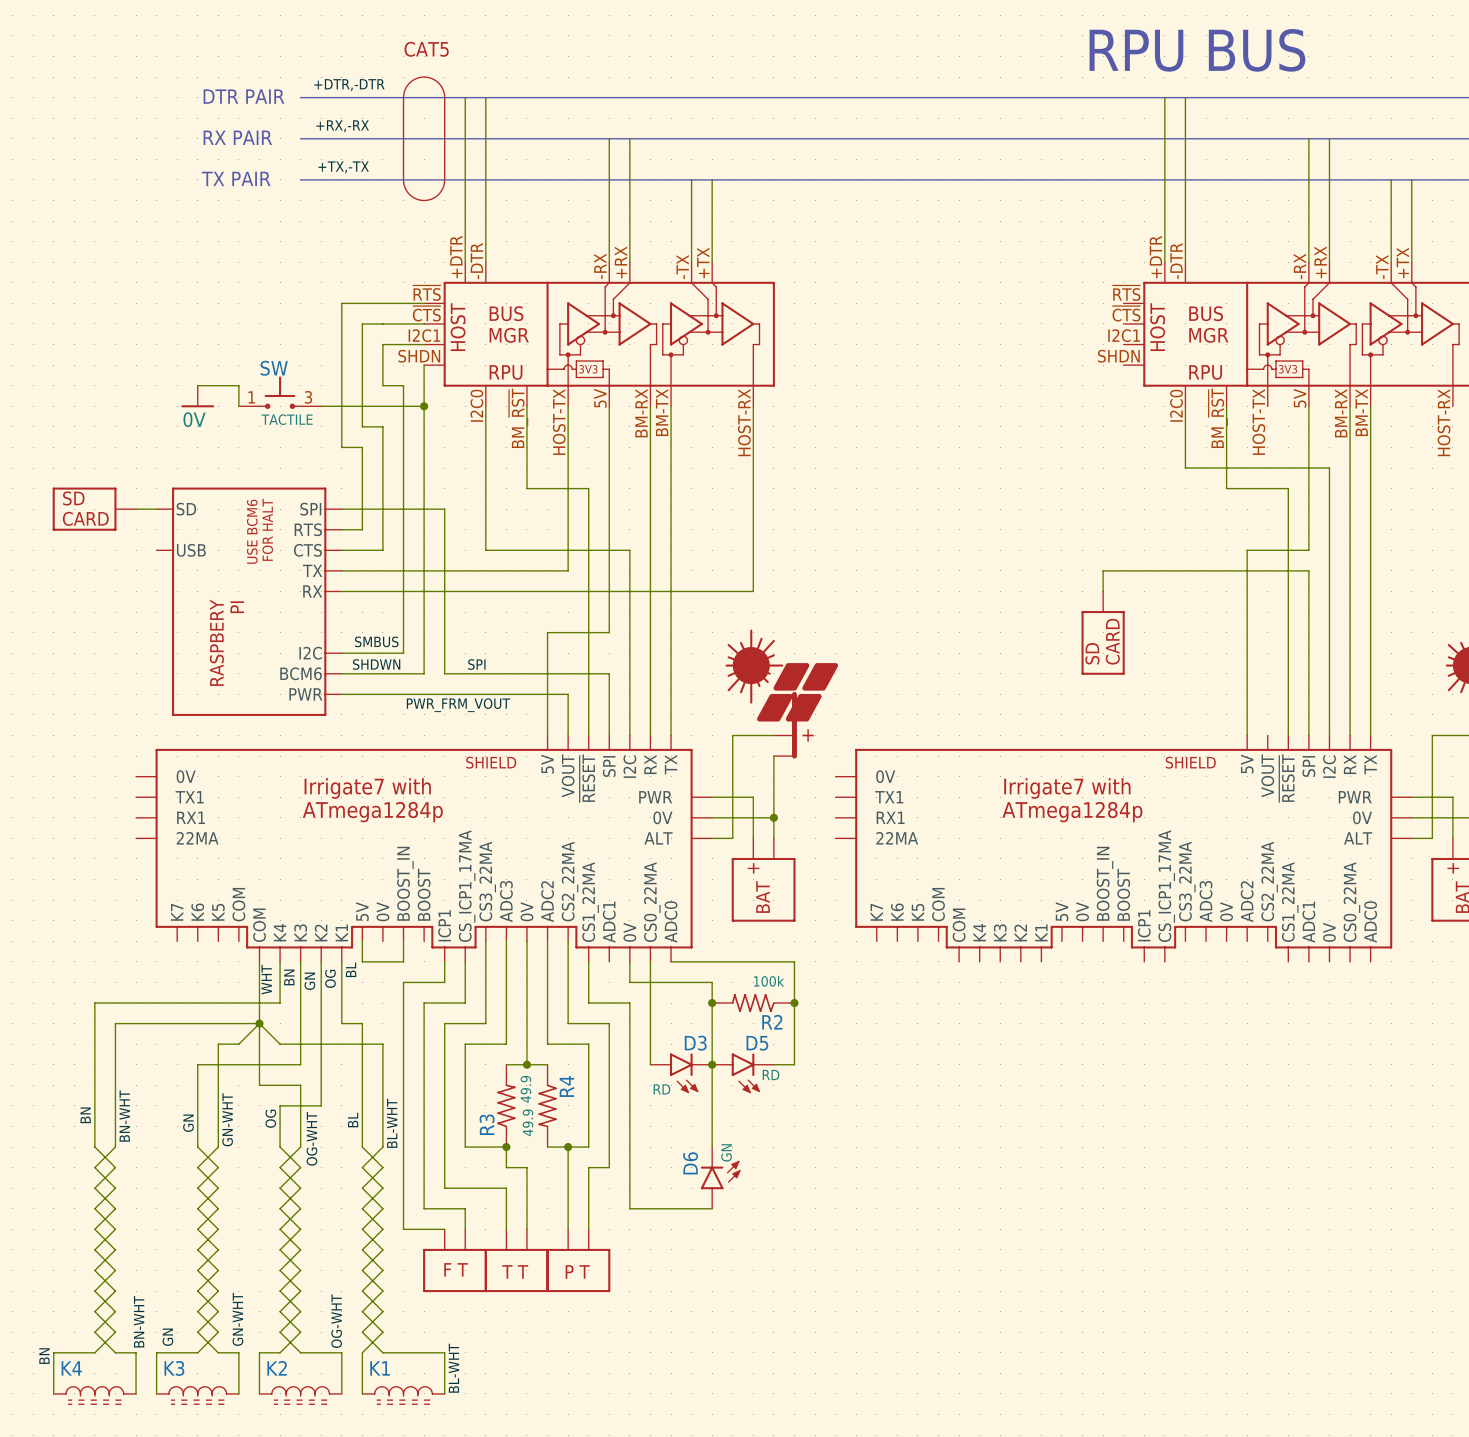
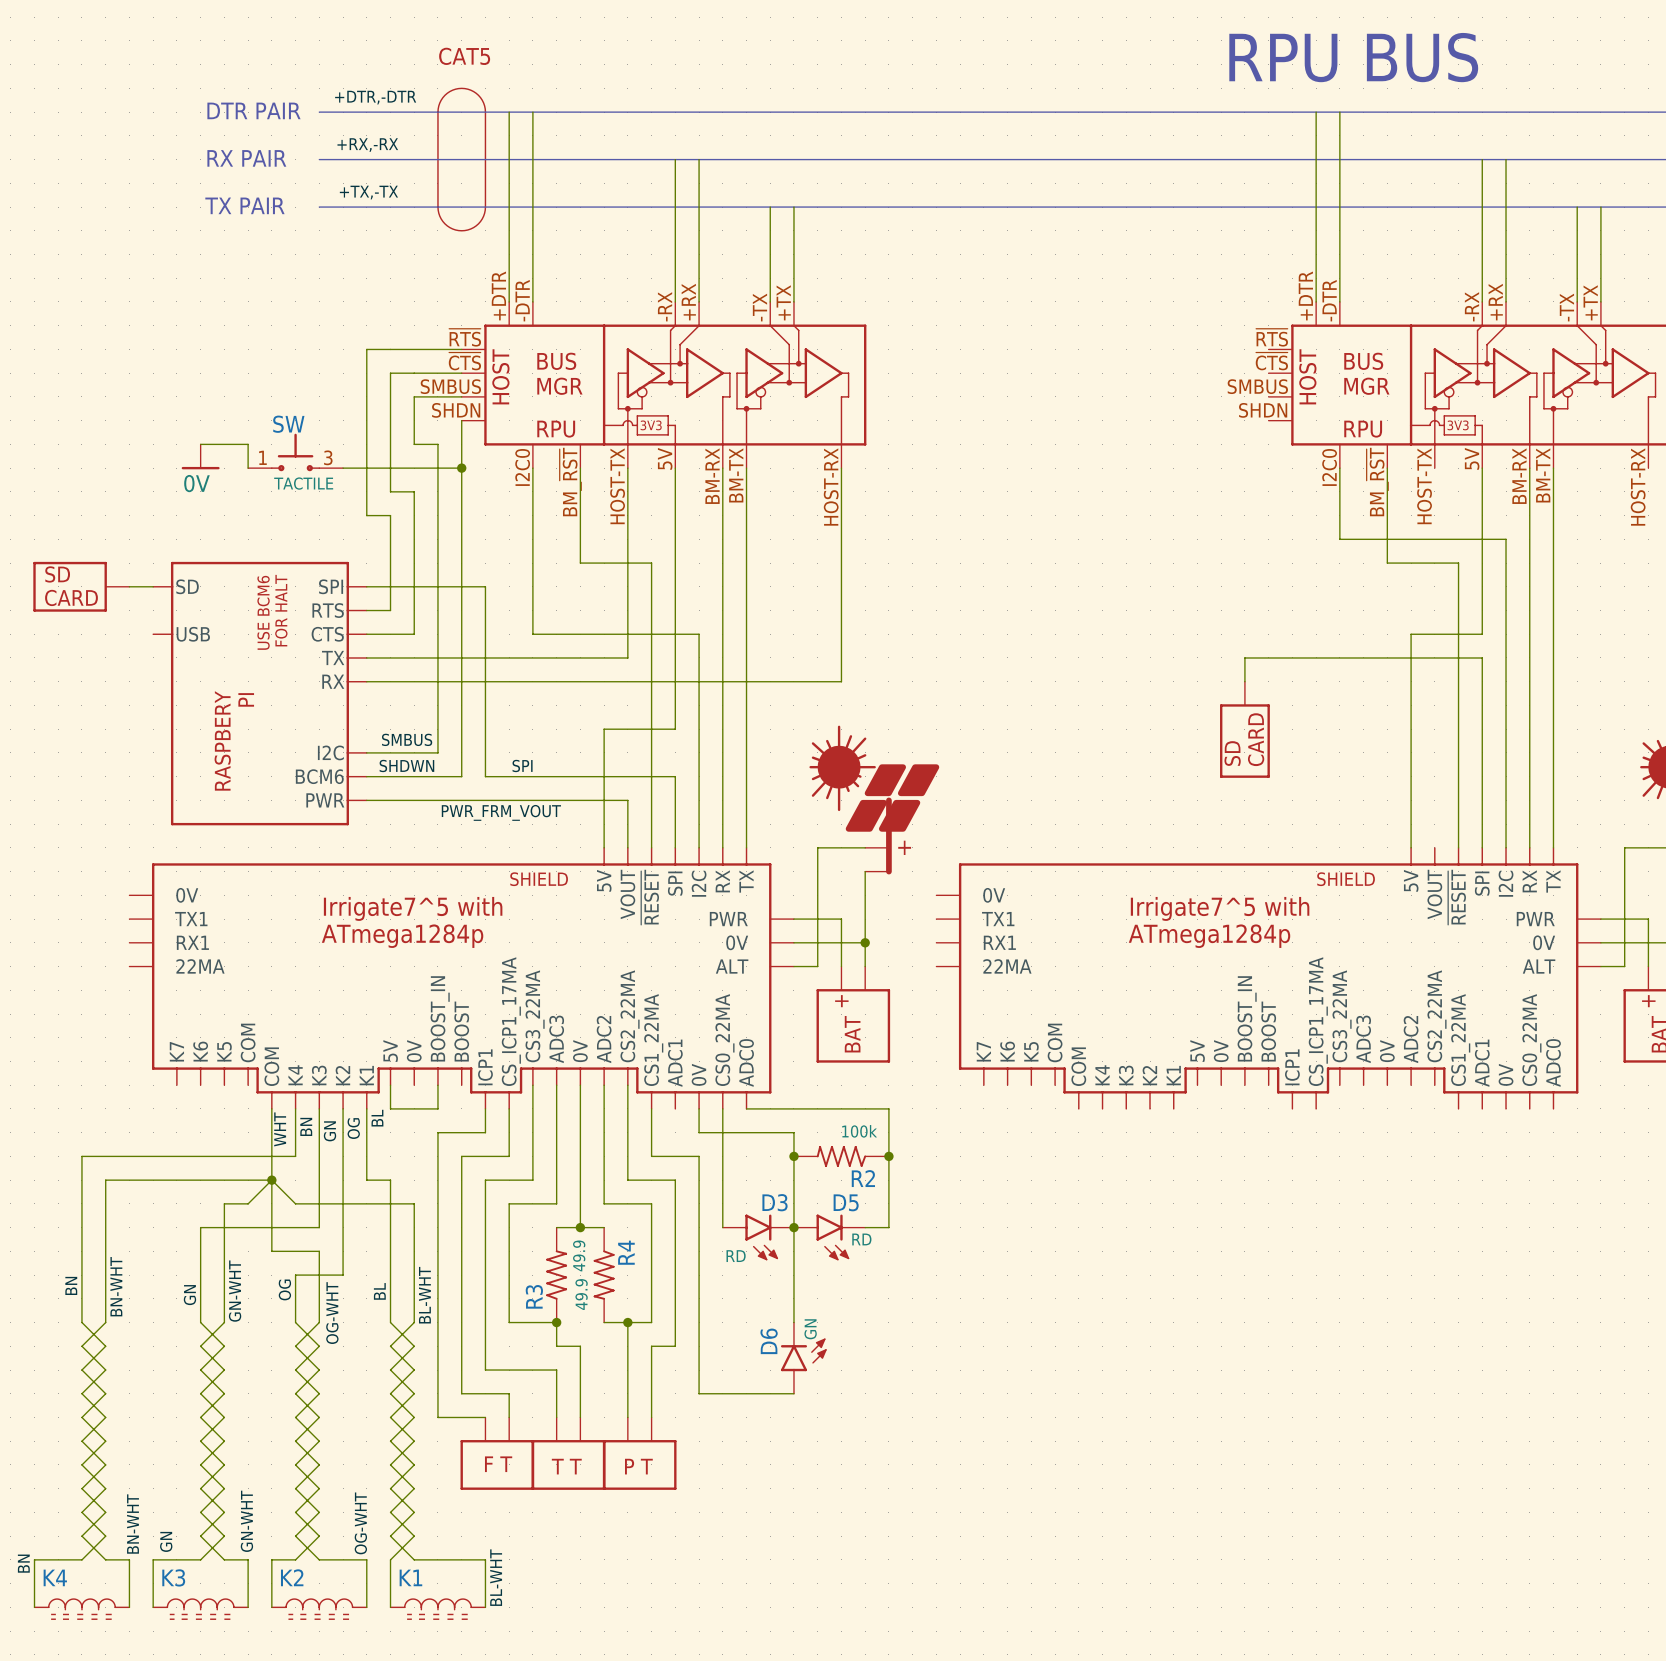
part pin number: I2C1 (424, 335) -> SMBUS (450, 386)
part pin number: I2C1 (1124, 335) -> SMBUS (1257, 386)
part text: Irrigate7 with (367, 788) -> Irrigate7^5 with (413, 908)
part text: Irrigate7 with (1067, 788) -> Irrigate7^5 with (1220, 908)

